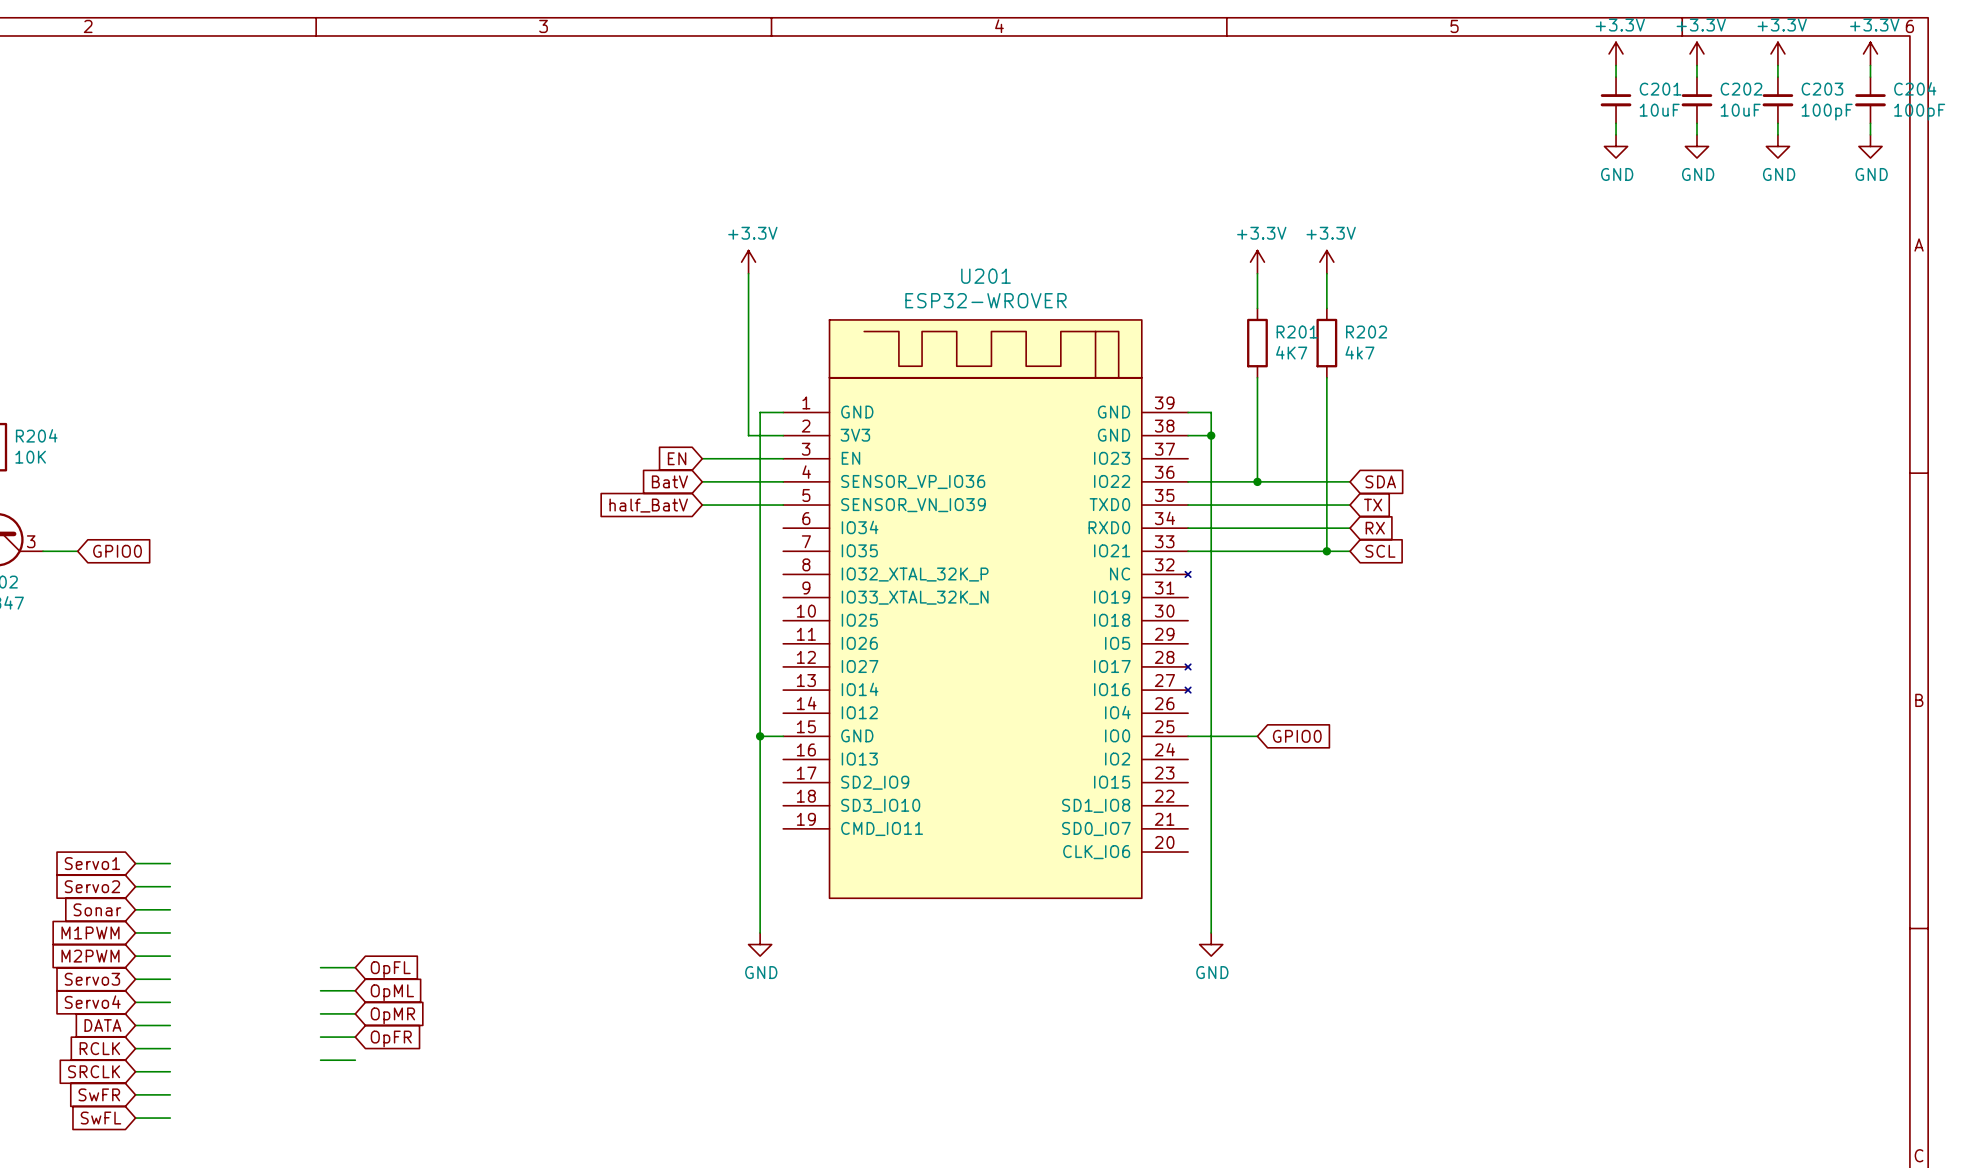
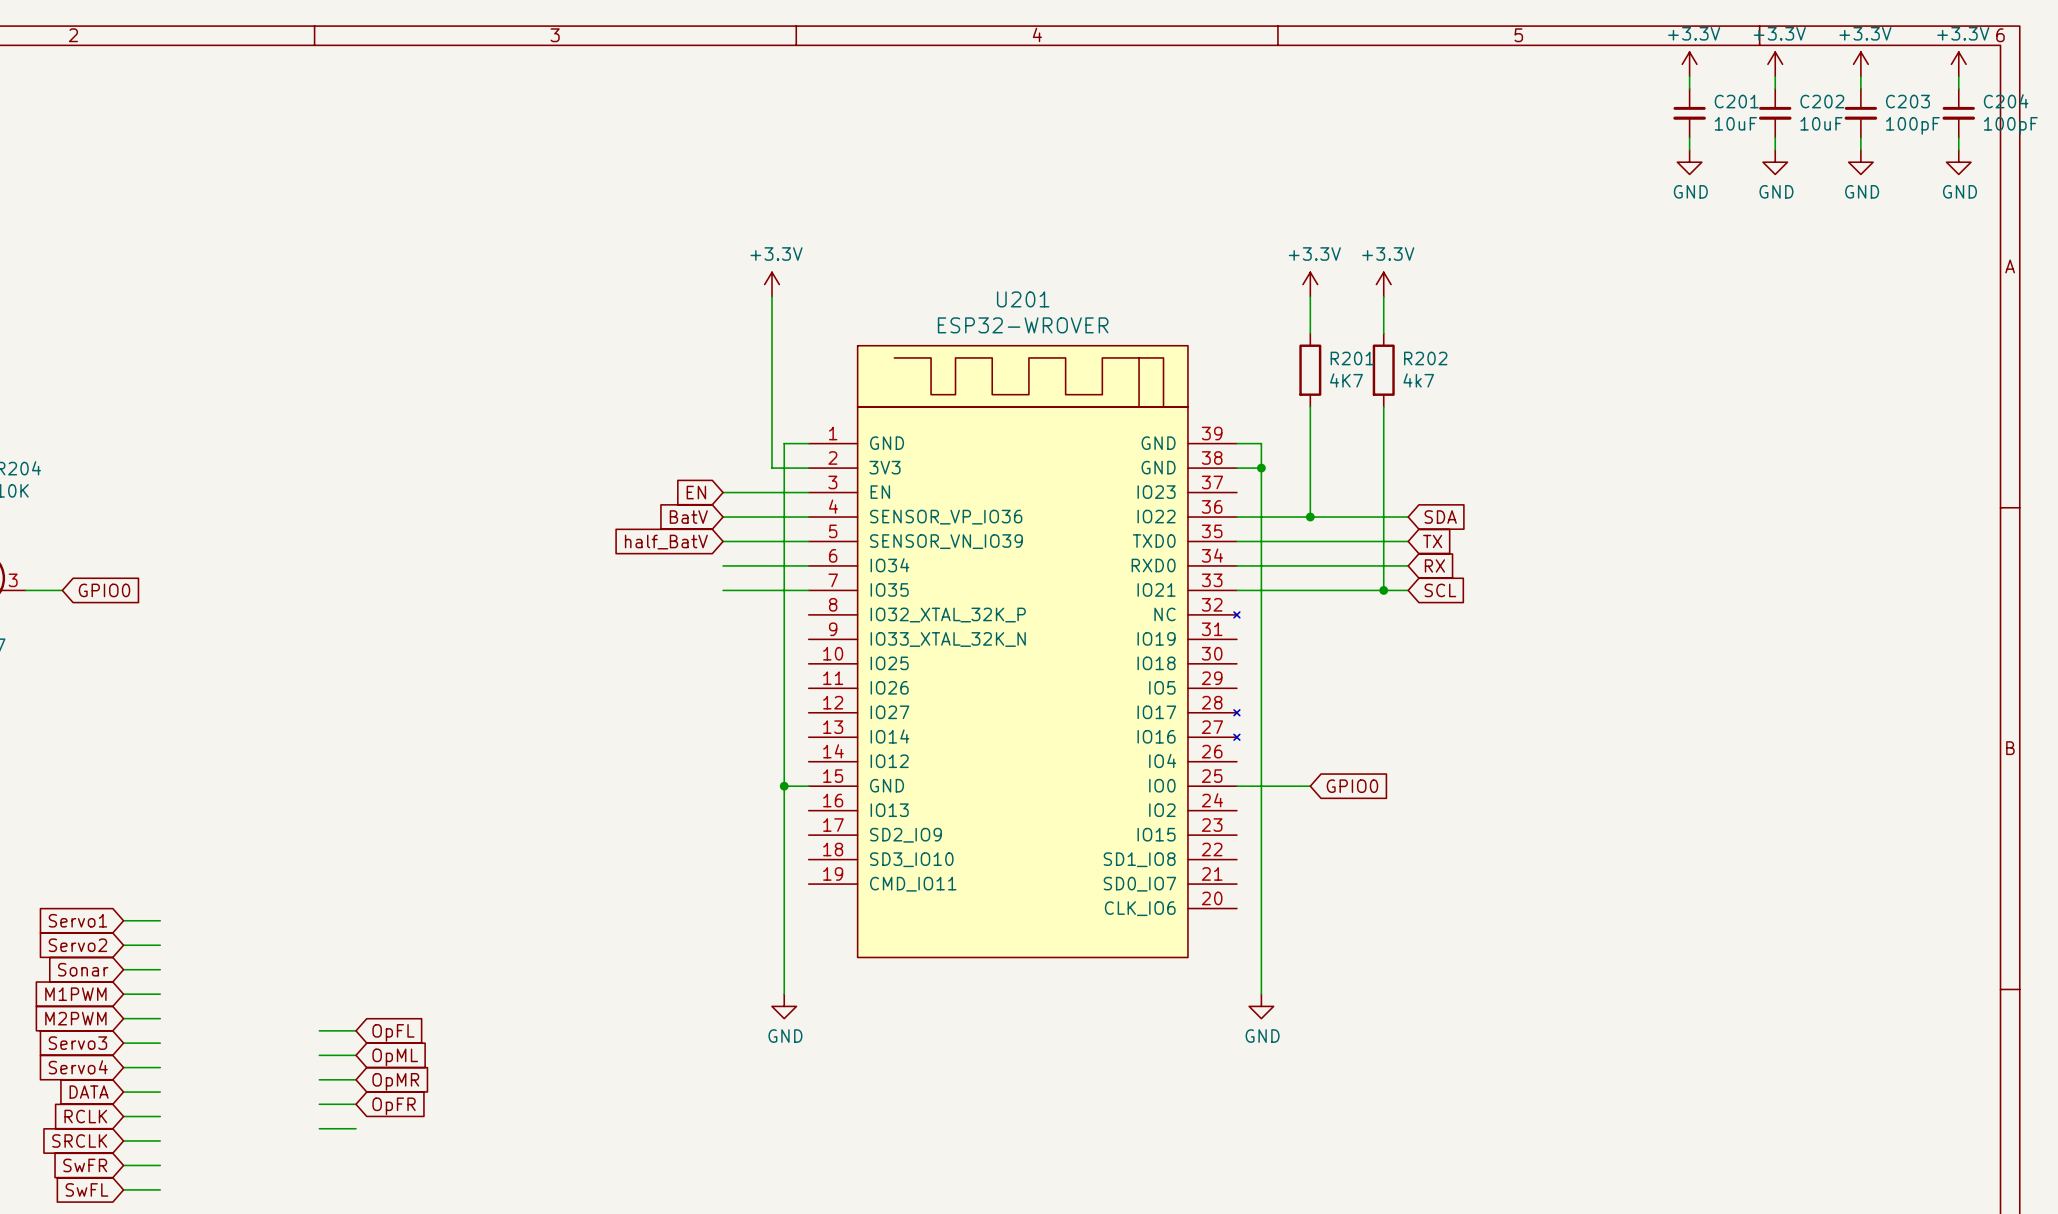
wire: none -> (723, 565) (808, 565)
wire: none -> (723, 590) (808, 590)

